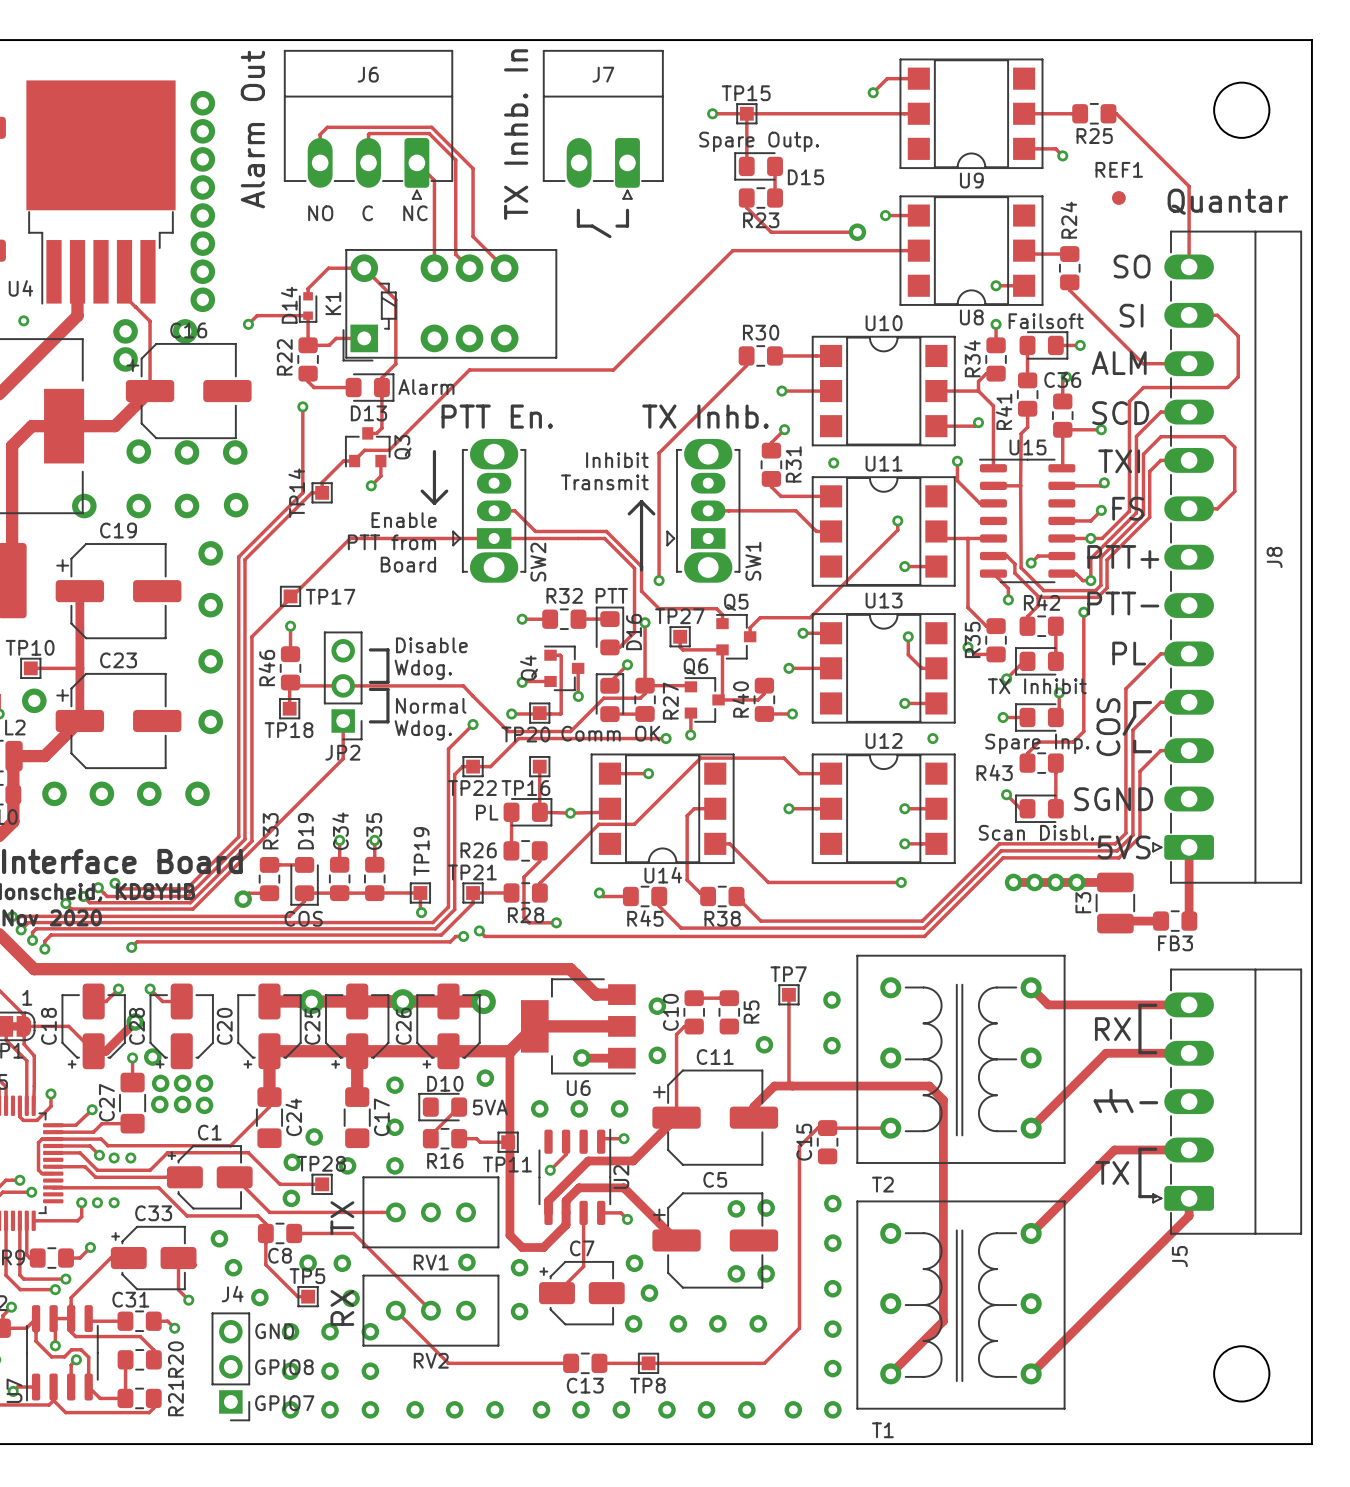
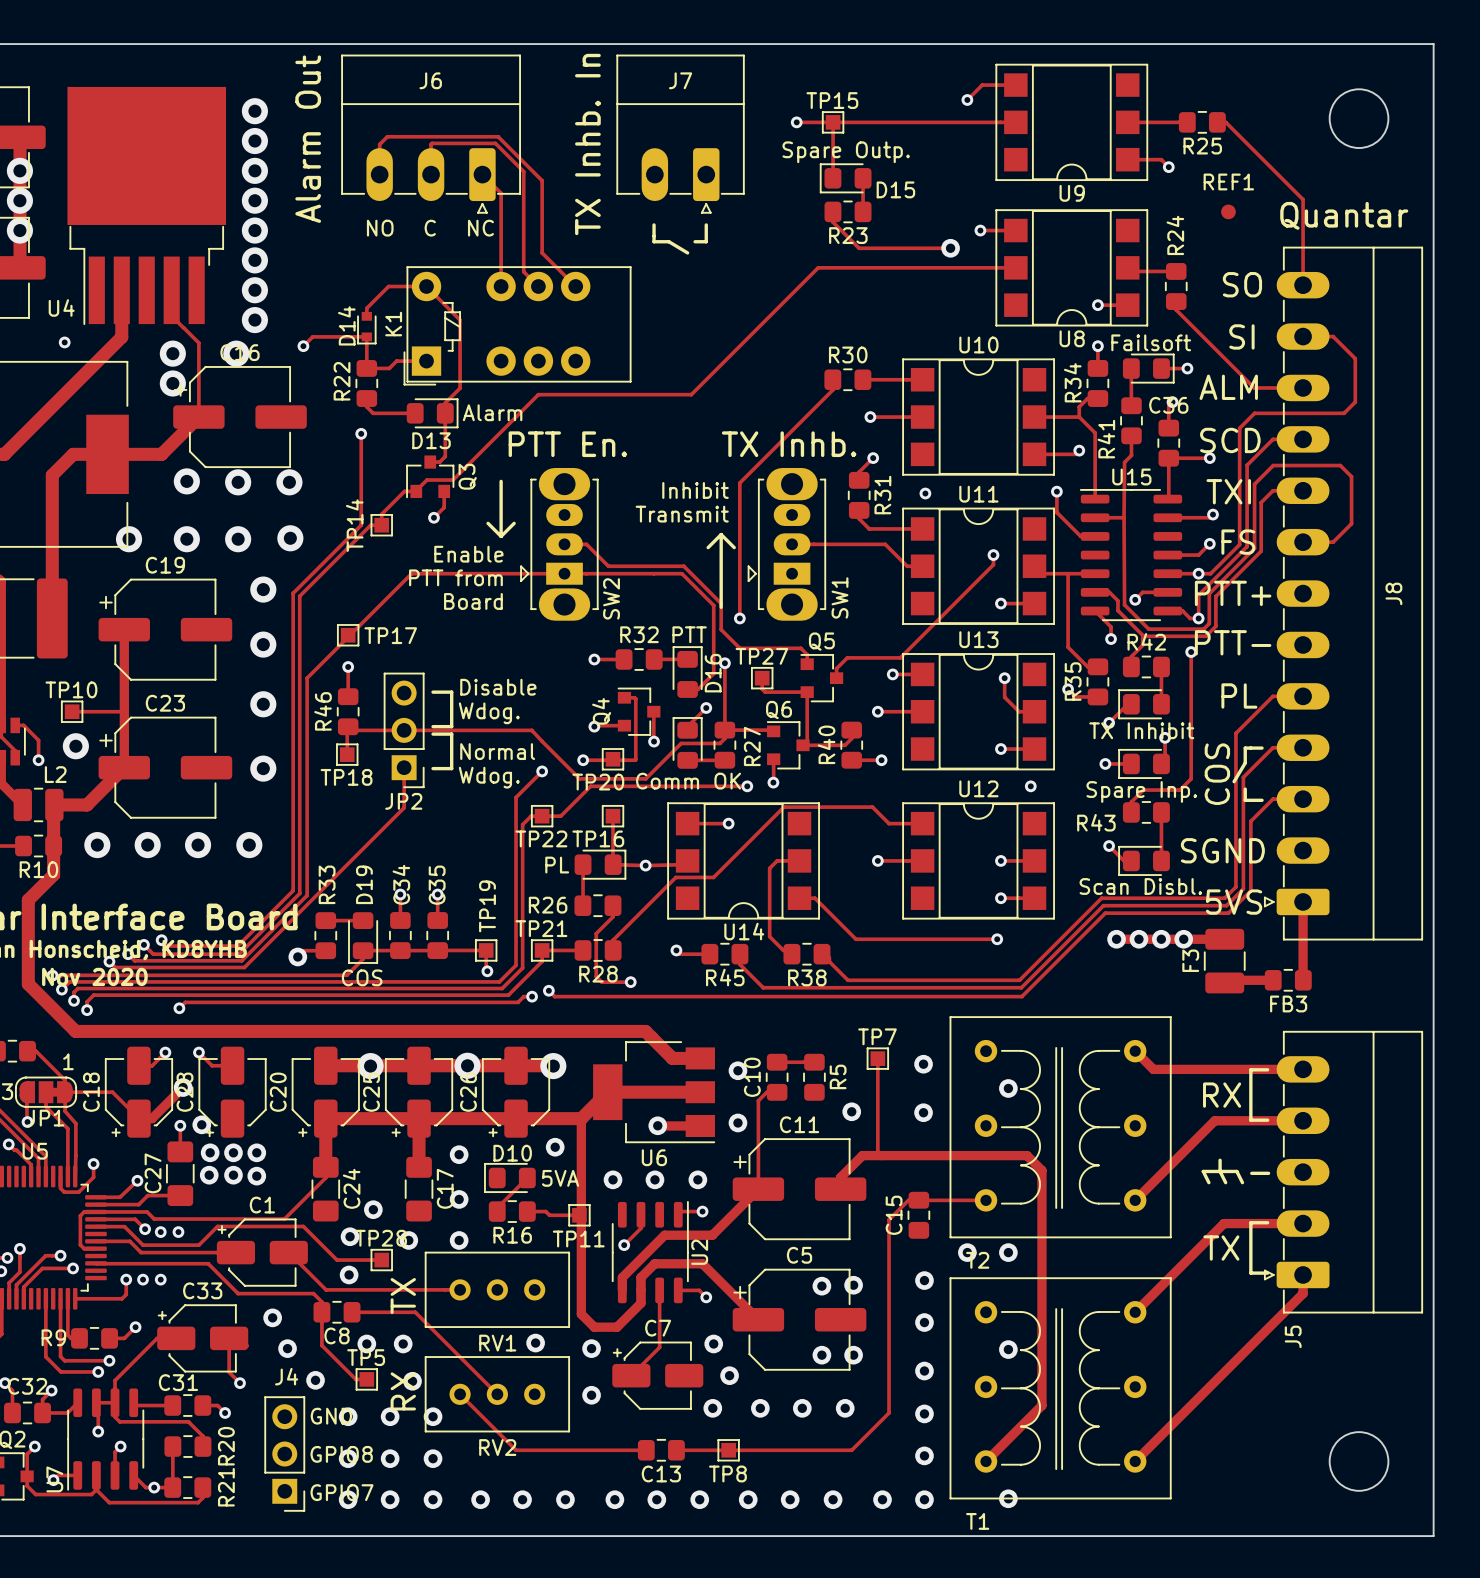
via: none -> (1008, 1088)
via: none -> (967, 1252)
via: none -> (1008, 1252)
via: none -> (1008, 1349)
track: (36, 1318) (36, 1341) (51, 1356) (64, 1356) (71, 1349) (81, 1349) (88, 1357) (88, 1387) -> none
via: none -> (154, 1487)
via: none -> (1008, 1498)

